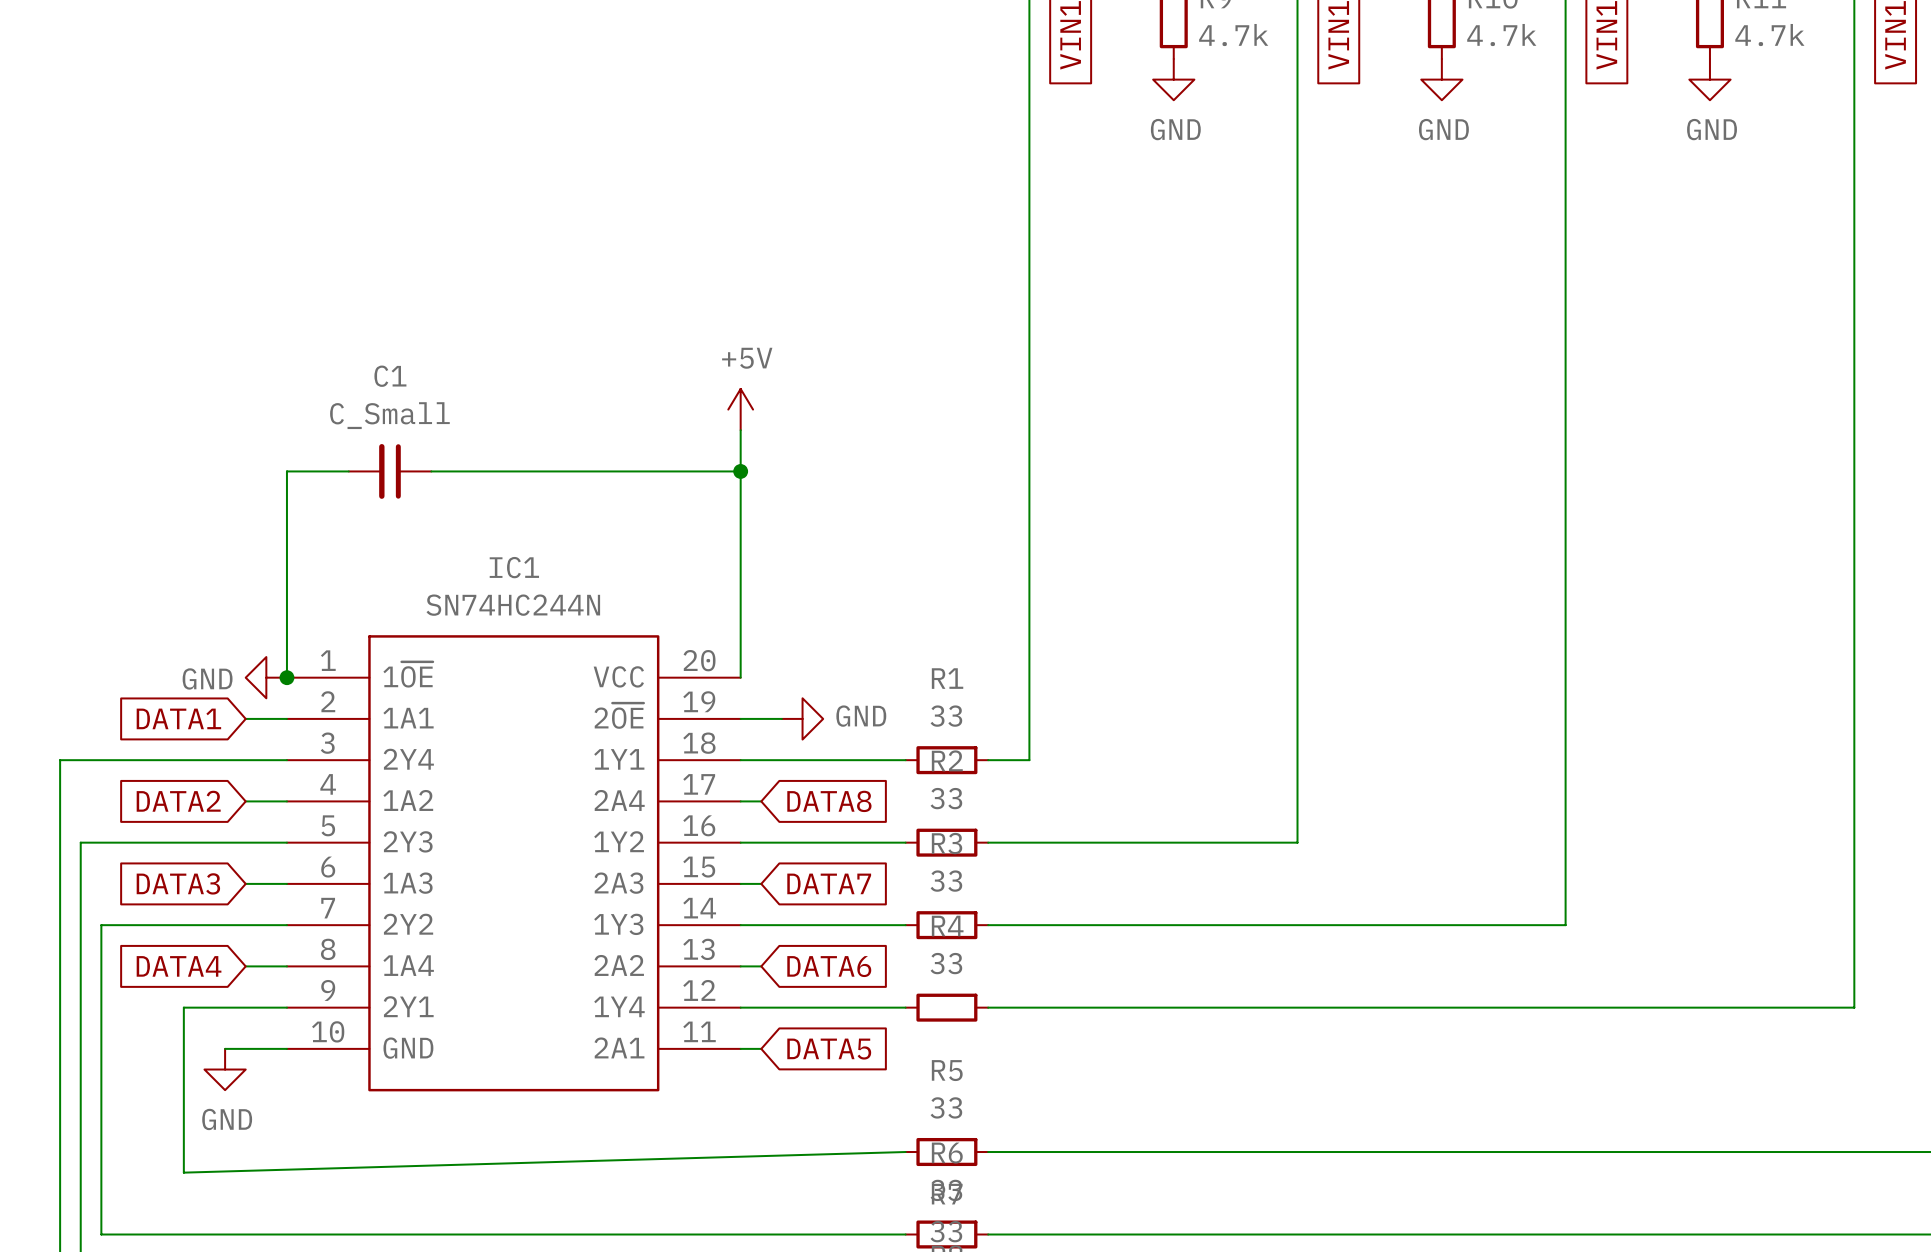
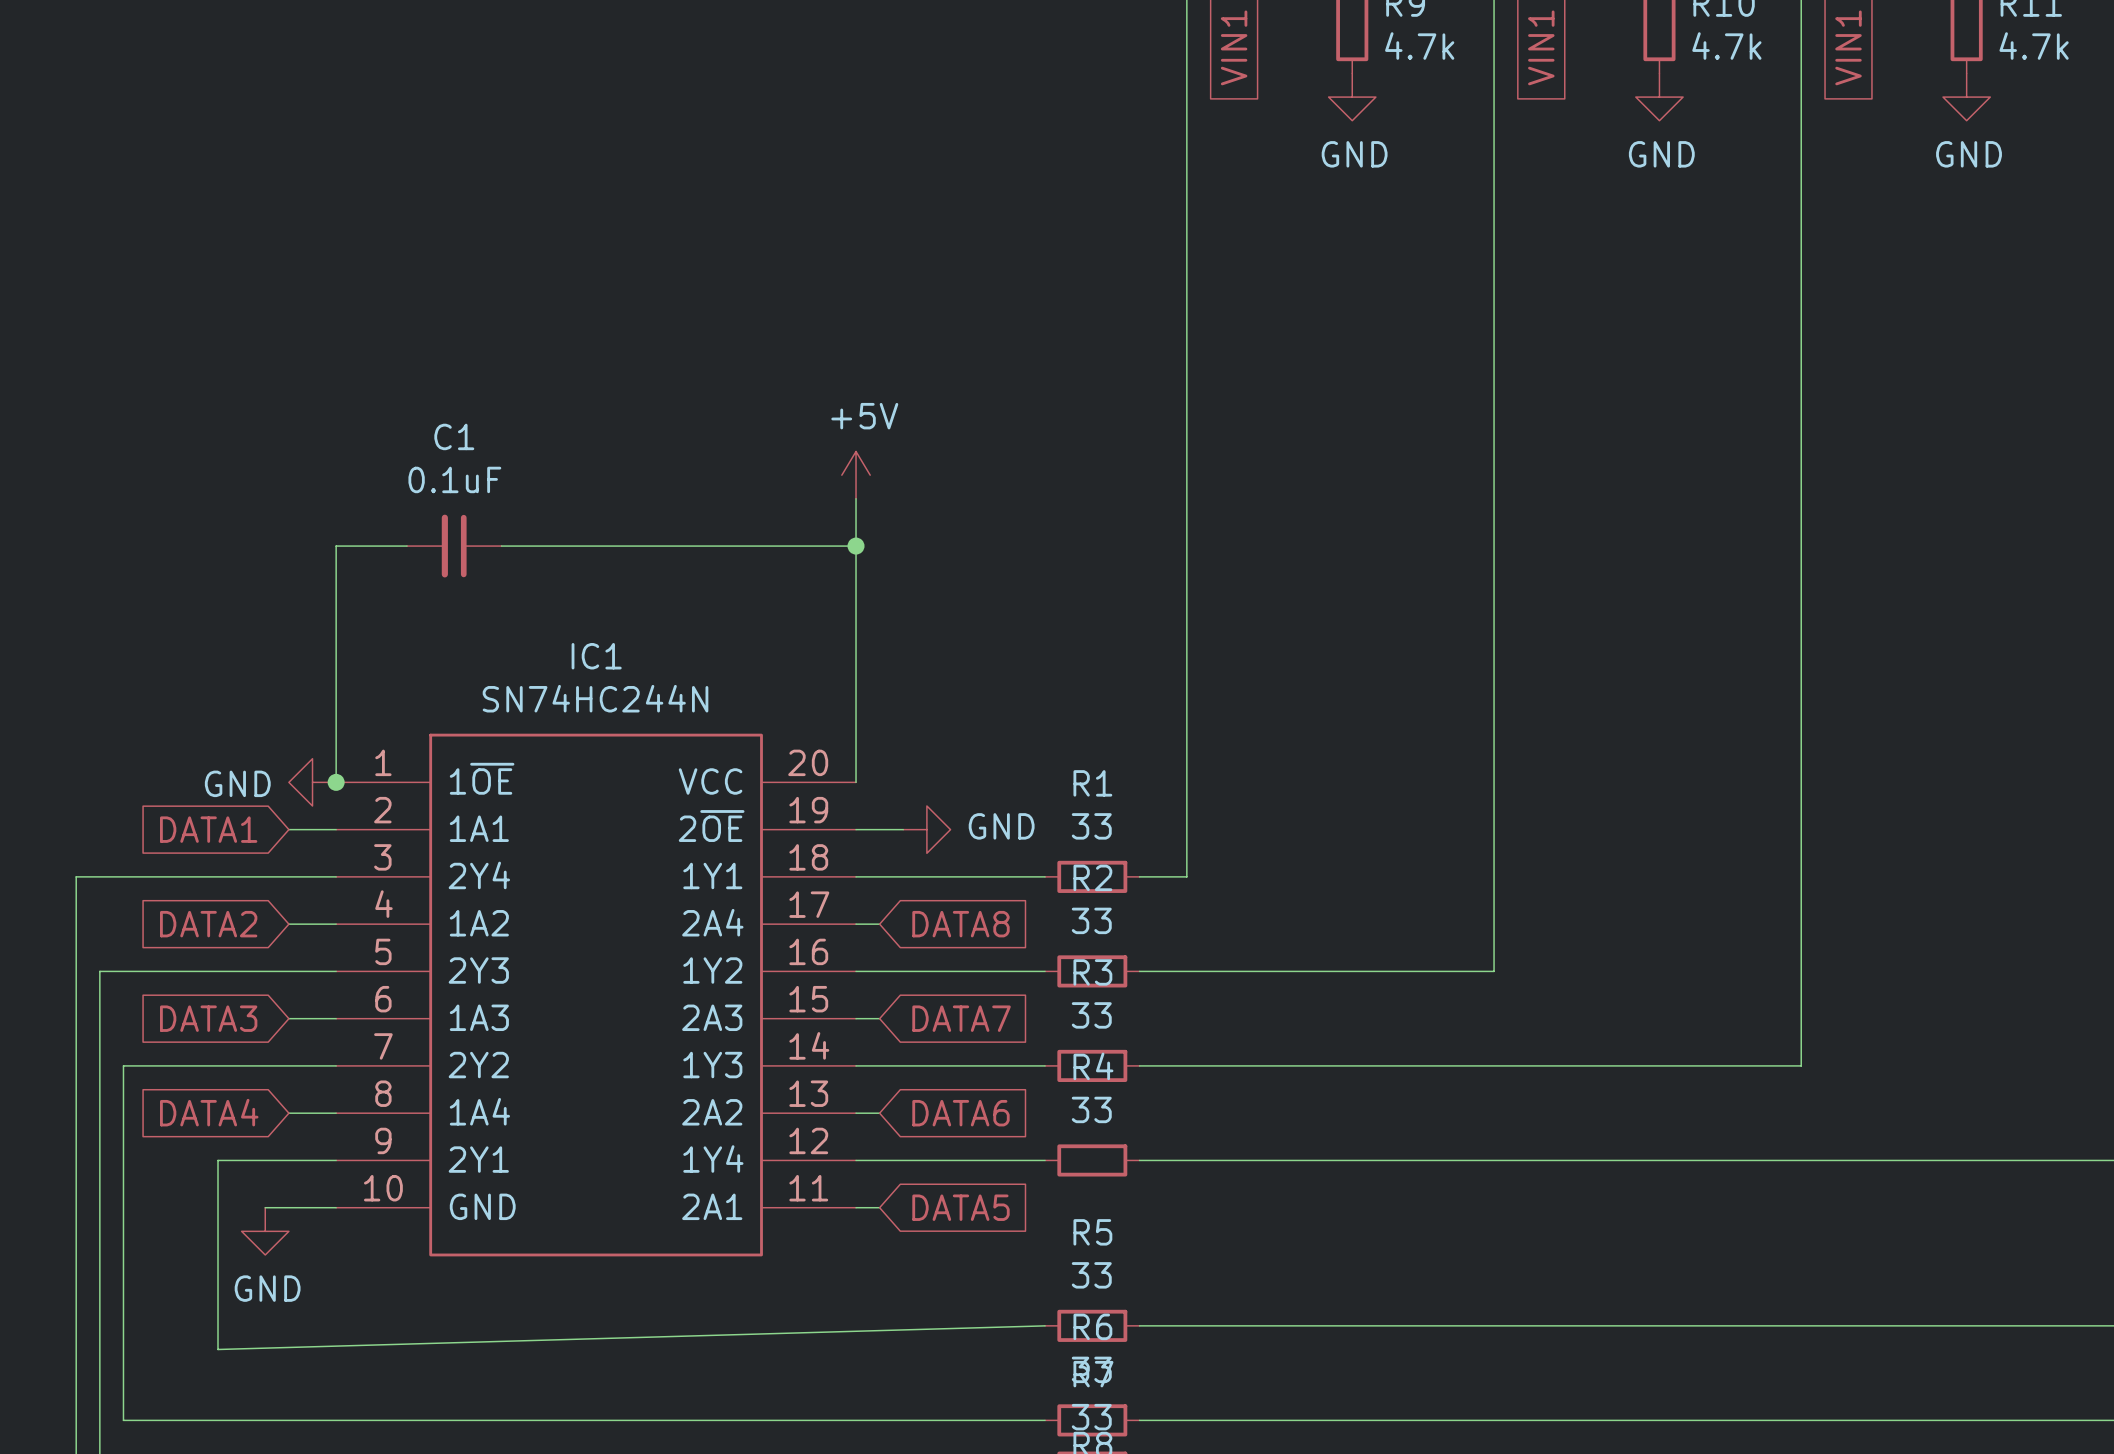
C1 value: C_Small (389, 415) -> 0.1uF (454, 479)

